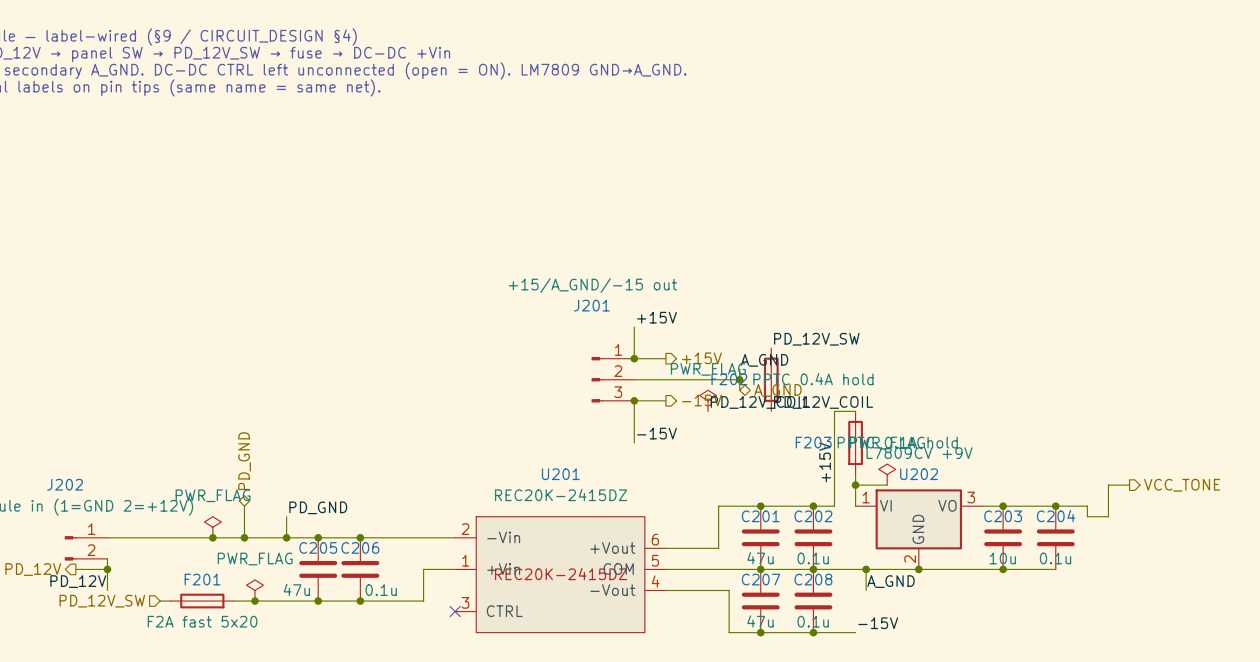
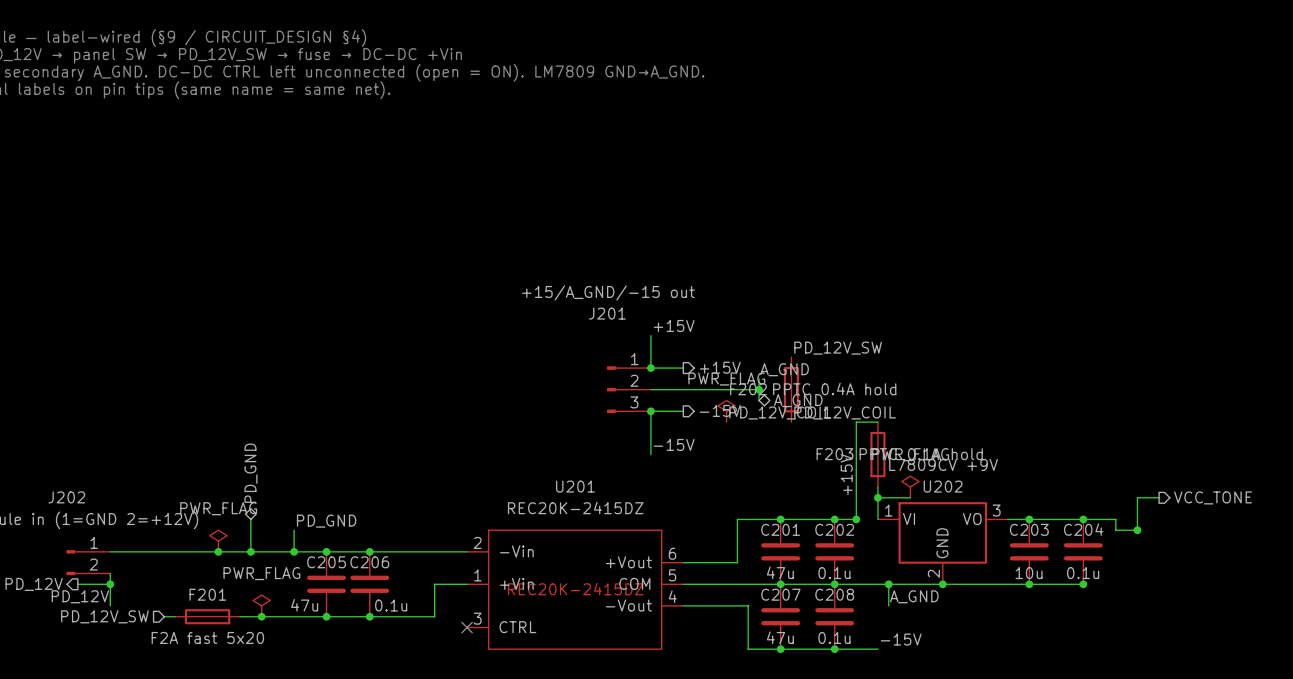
junction: none -> (856, 519)
junction: none -> (1137, 530)
junction: none -> (1083, 584)

